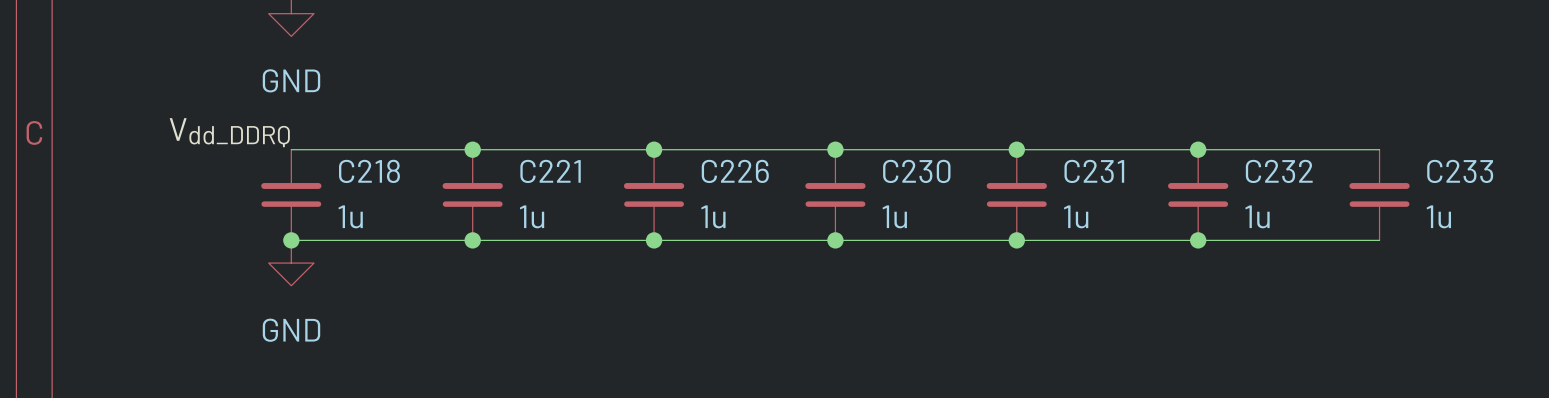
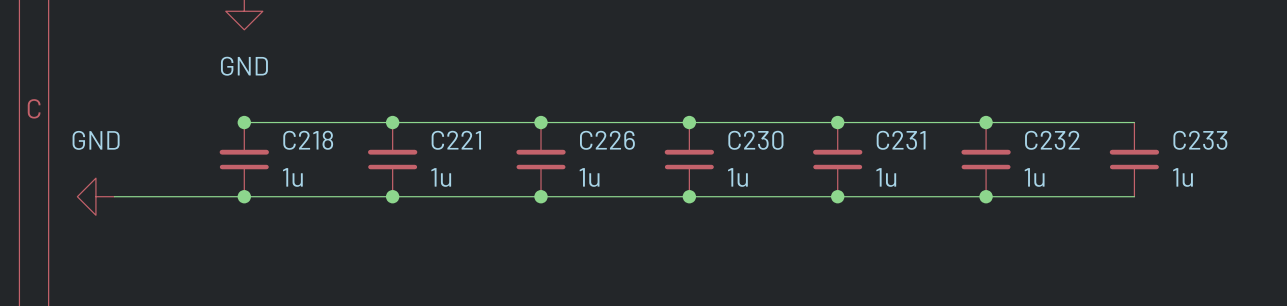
label: Vdd_DDRQ (229, 132) -> none
junction: none -> (244, 122)
wire: none -> (114, 196) (244, 196)
power symbol rotation: 0° (291, 263) -> 90° clockwise (95, 196)
power symbol position: GND (291, 263) -> GND (95, 196)
power symbol text position: GND (291, 330) -> GND (96, 140)

